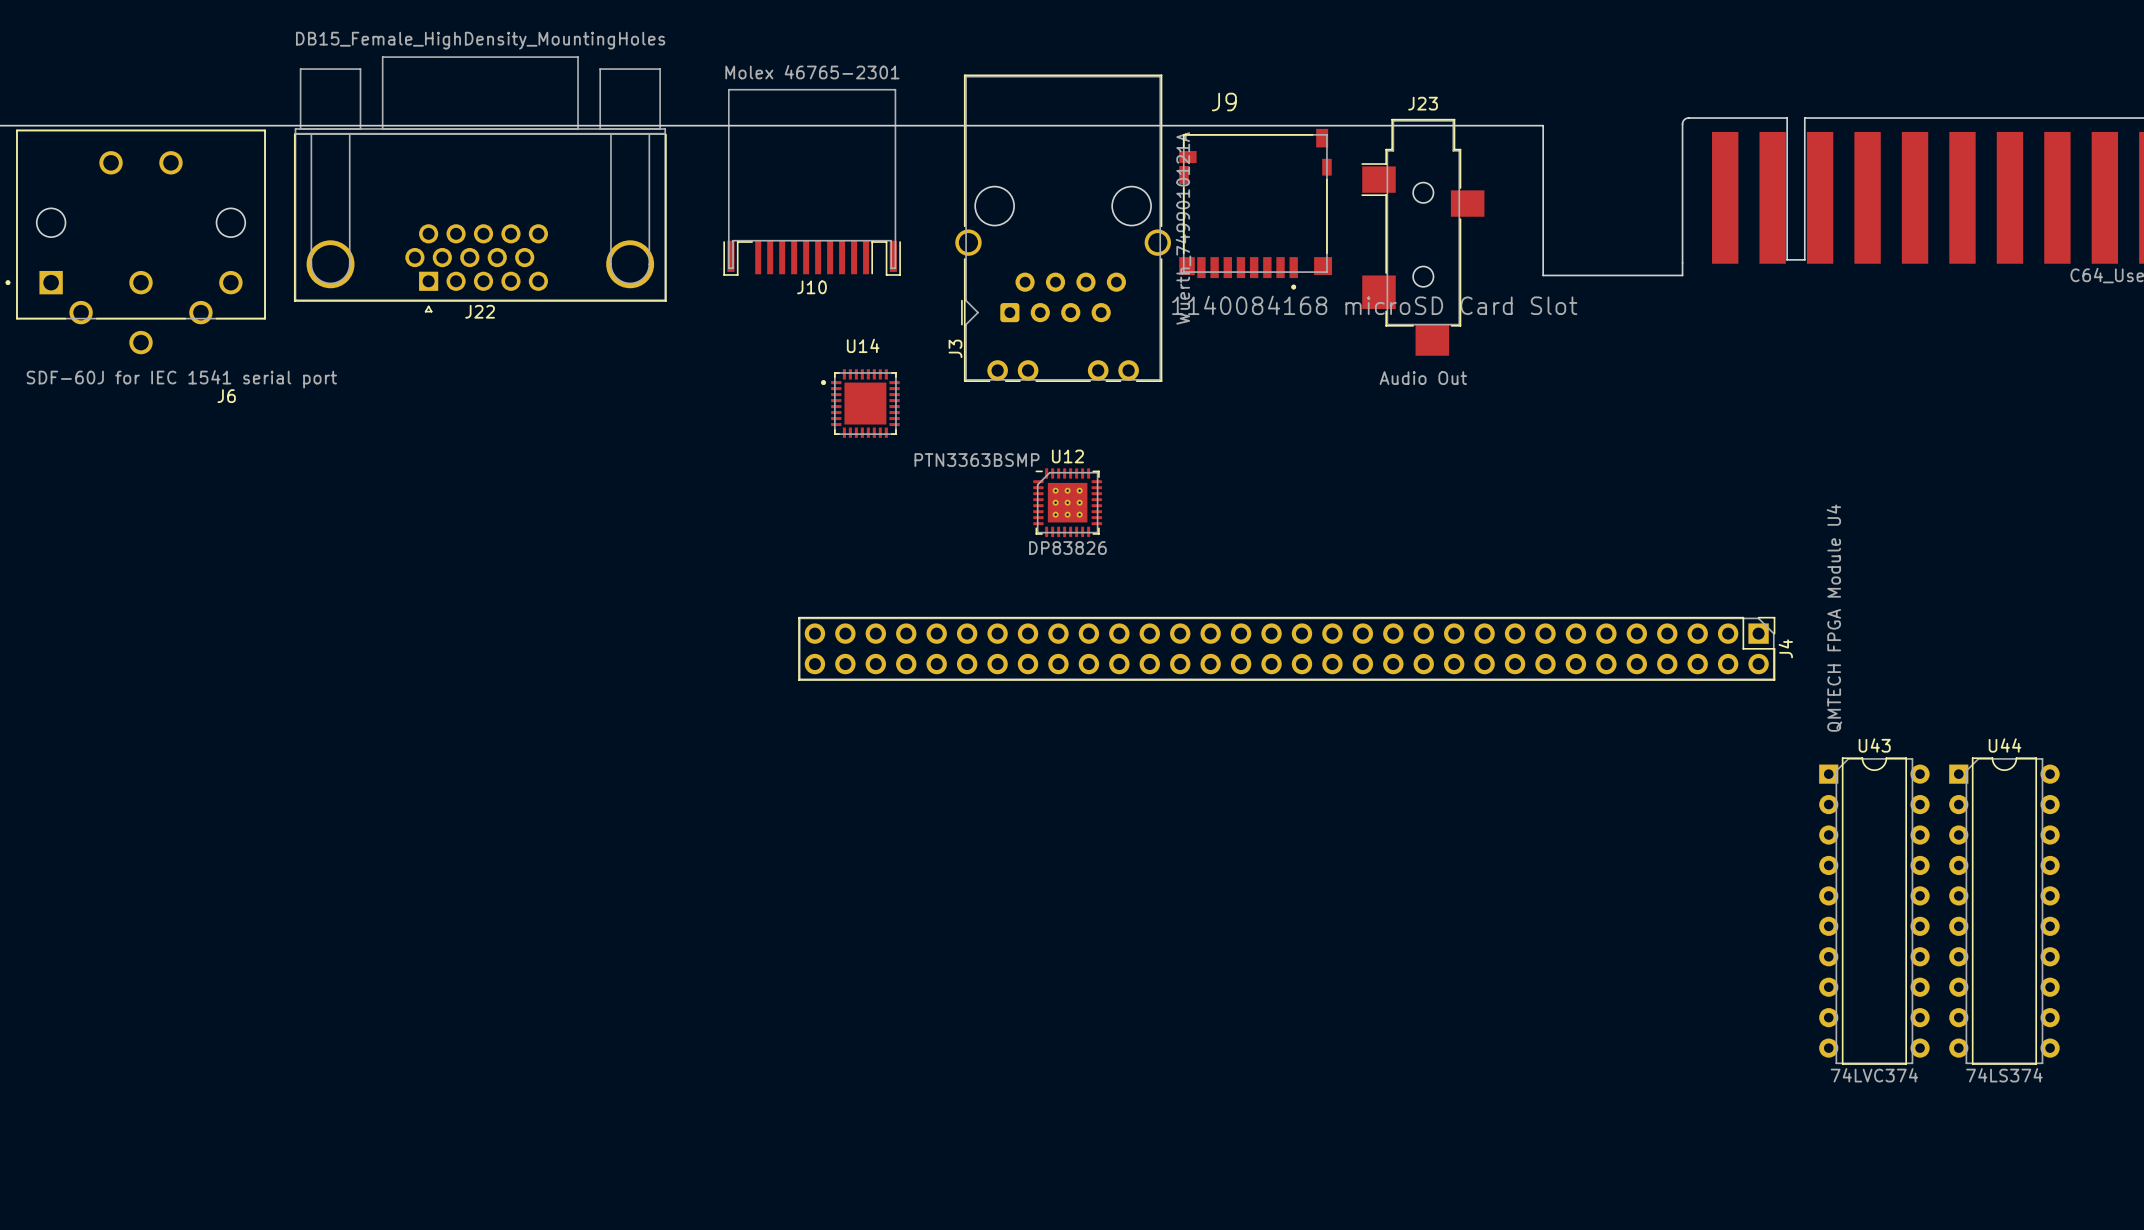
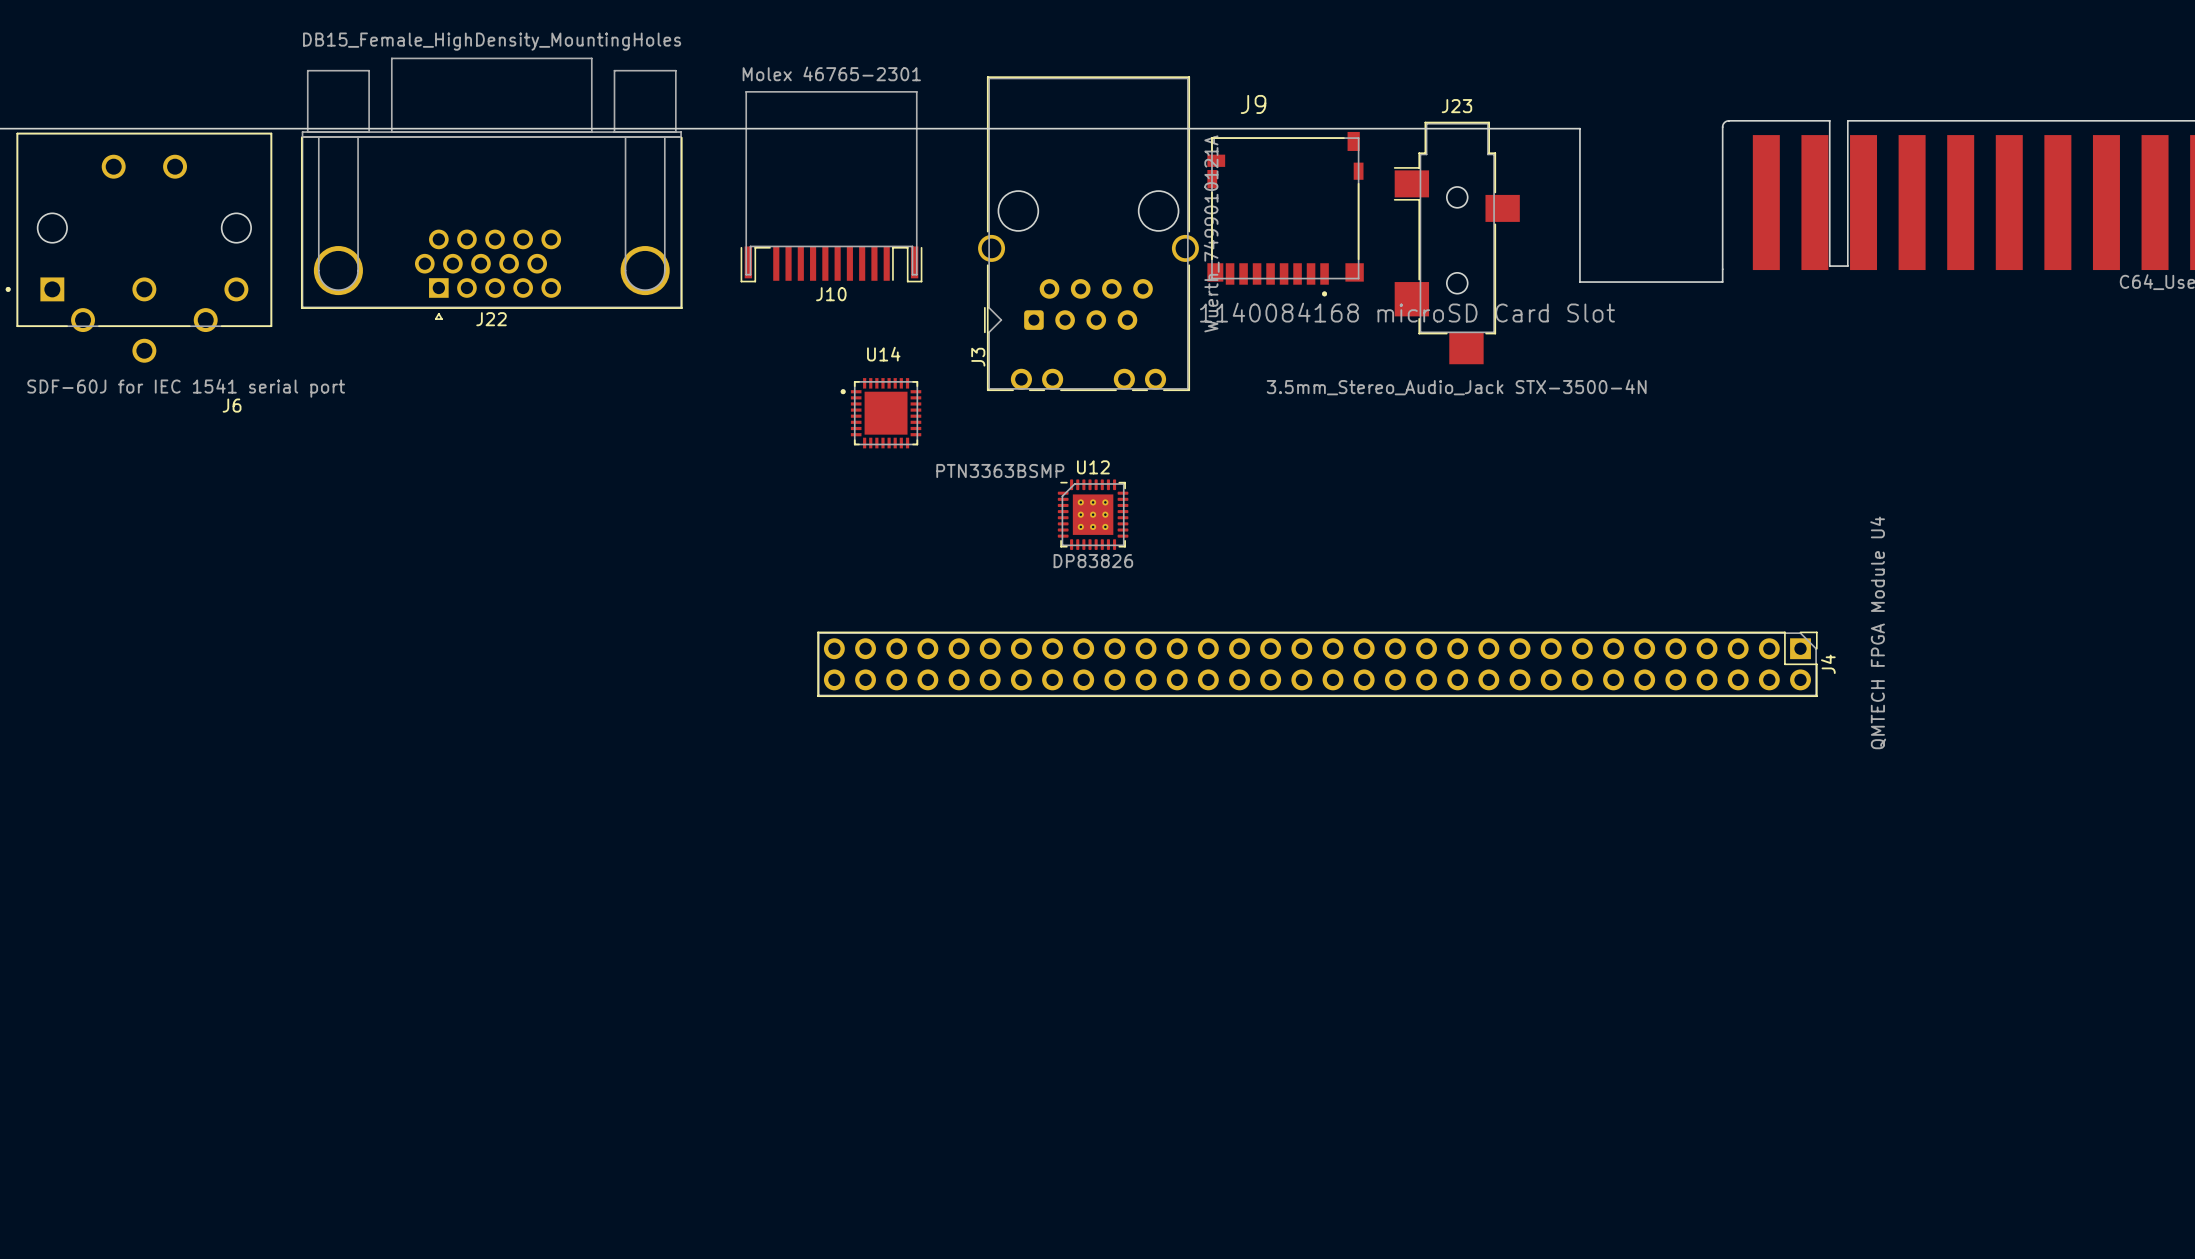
J23 value: Audio Out (1423, 378) -> 3.5mm_Stereo_Audio_Jack STX-3500-4N (1456, 387)
U43: 74LVC374 (1874, 911) -> none
U44: 74LS374 (2004, 911) -> none

